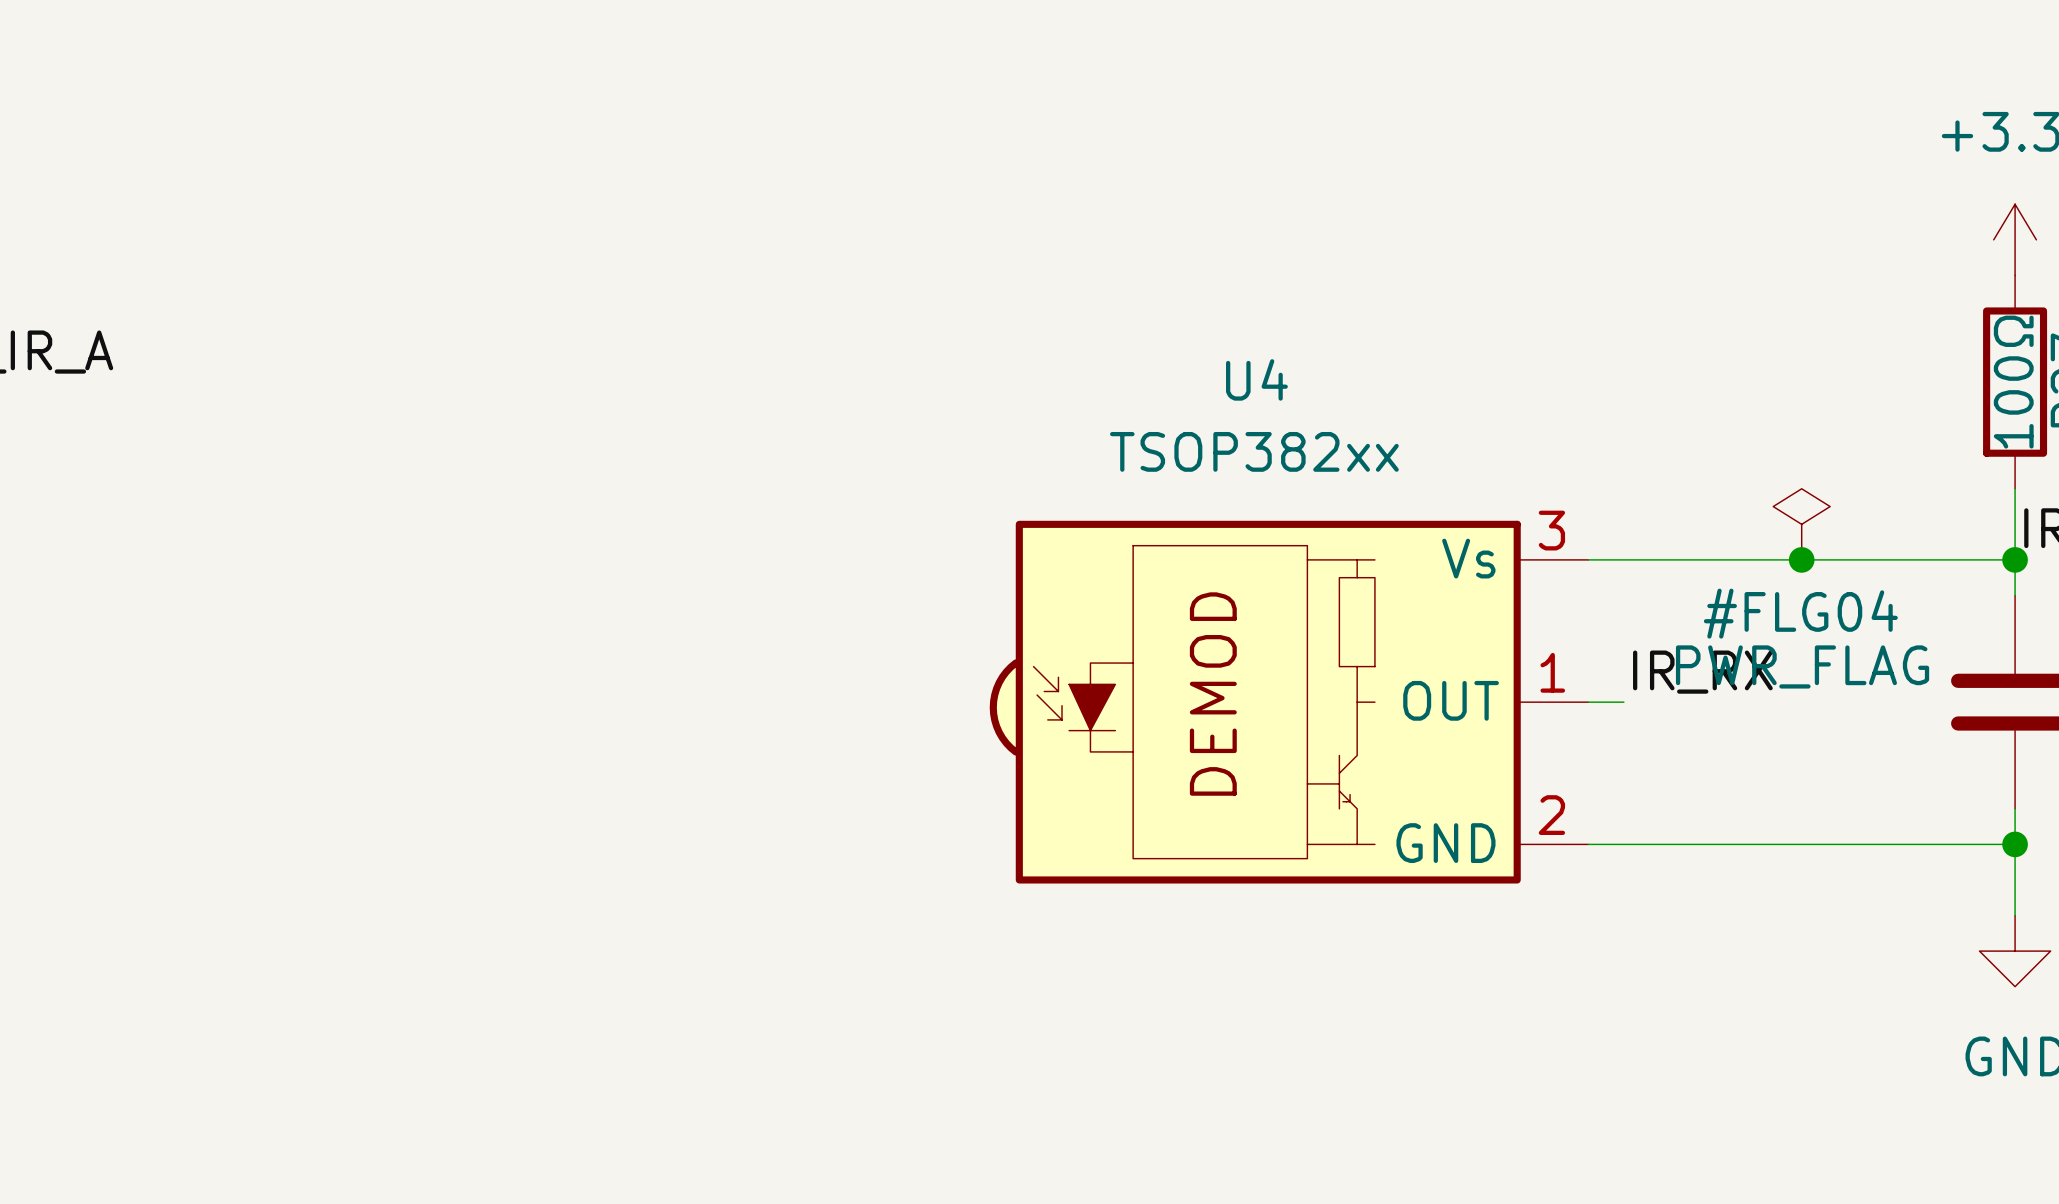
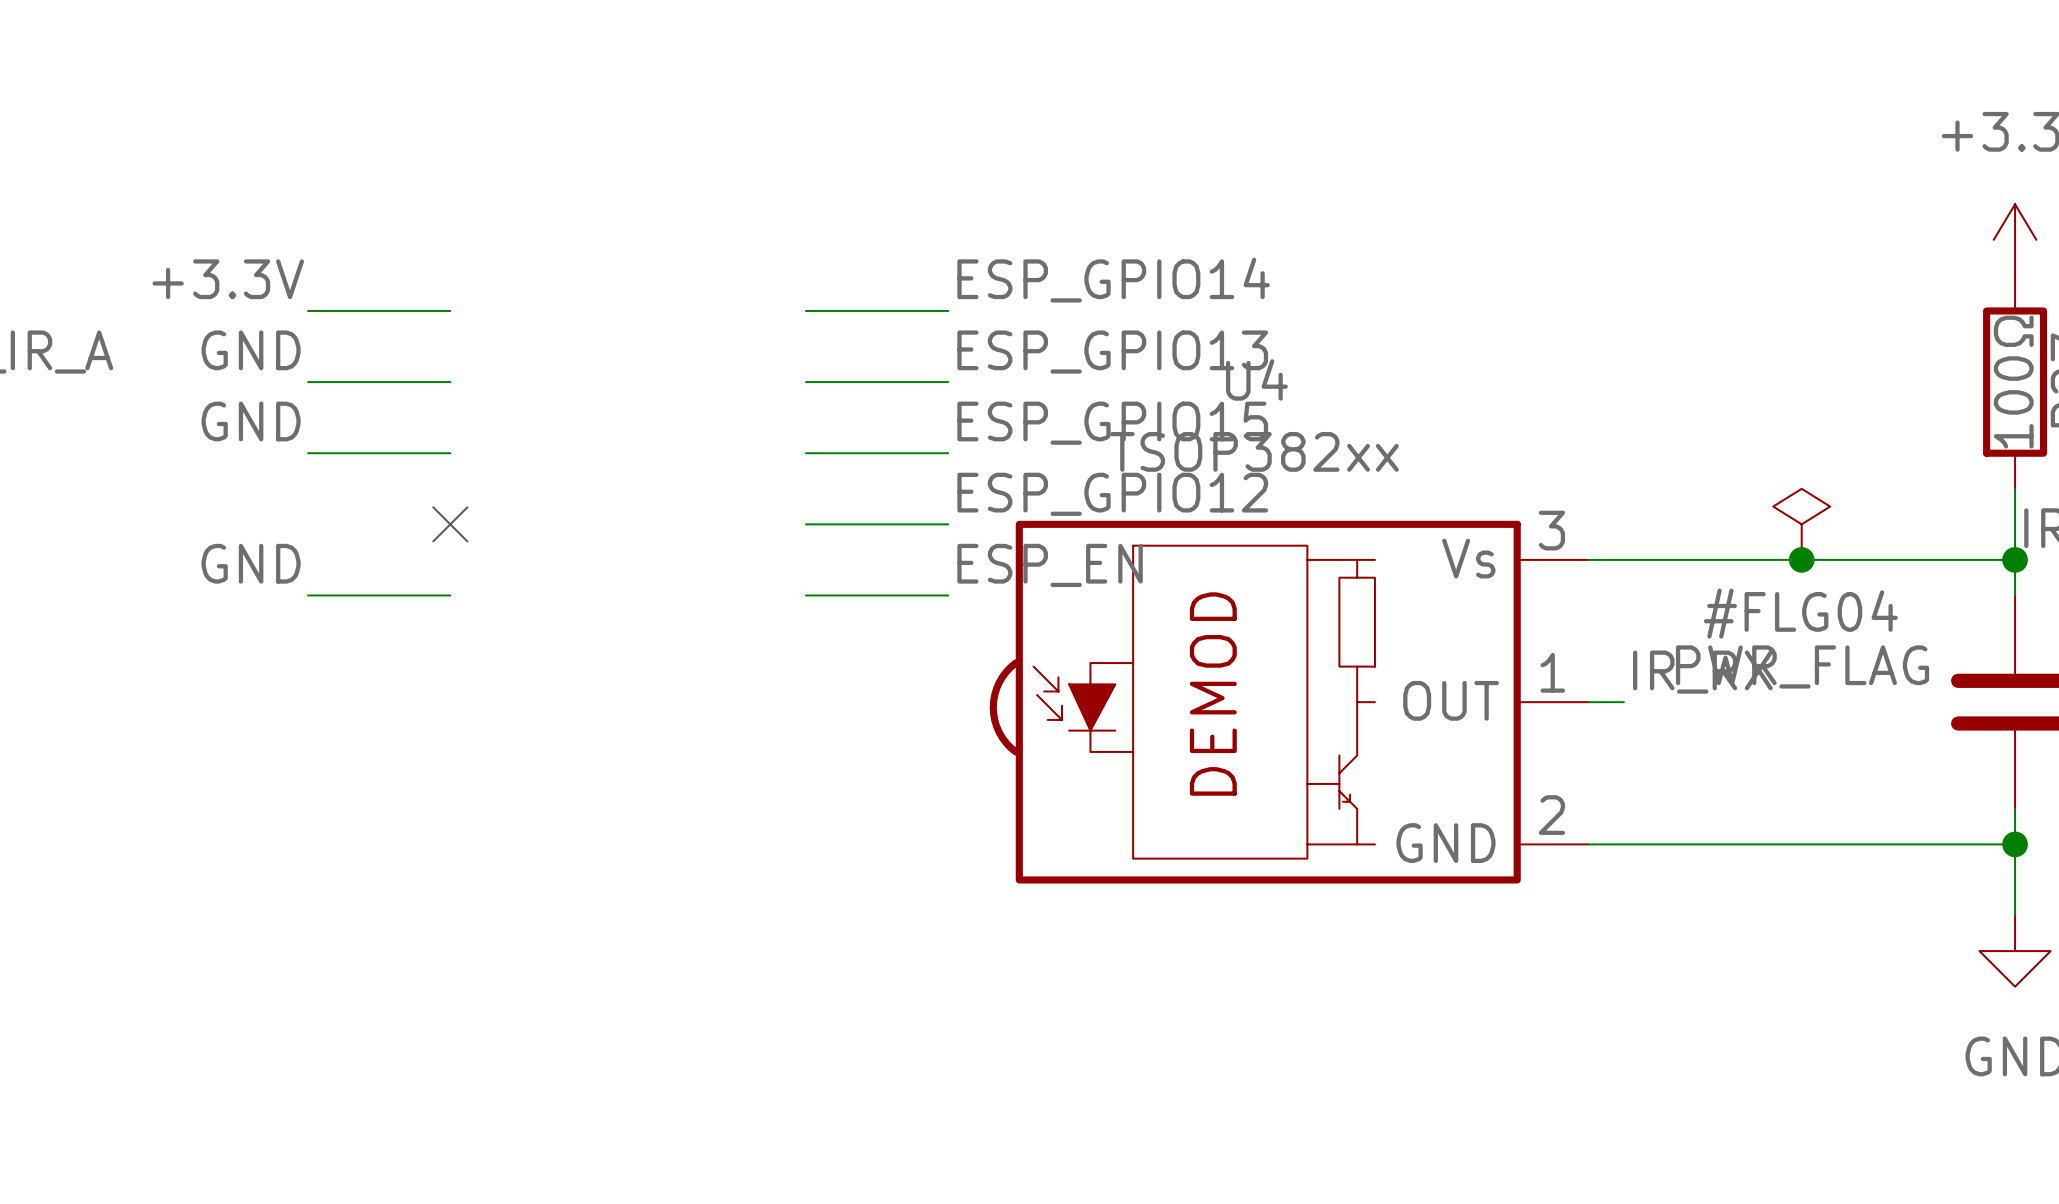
label: none -> +3.3V (228, 279)
label: none -> ESP_GPIO14 (1113, 280)
wire: none -> (308, 310) (450, 310)
wire: none -> (805, 310) (948, 310)
label: none -> GND (251, 350)
label: none -> ESP_GPIO13 (1112, 352)
wire: none -> (308, 382) (450, 382)
wire: none -> (805, 382) (948, 382)
label: none -> GND (251, 421)
label: none -> ESP_GPIO15 (1112, 423)
wire: none -> (308, 453) (450, 453)
wire: none -> (805, 453) (948, 453)
label: none -> ESP_GPIO12 (1112, 494)
no-connect mark: none -> (450, 524)
wire: none -> (805, 524) (948, 524)
label: none -> GND (251, 563)
label: none -> ESP_EN (1050, 565)
wire: none -> (308, 595) (450, 595)
wire: none -> (805, 595) (948, 595)

